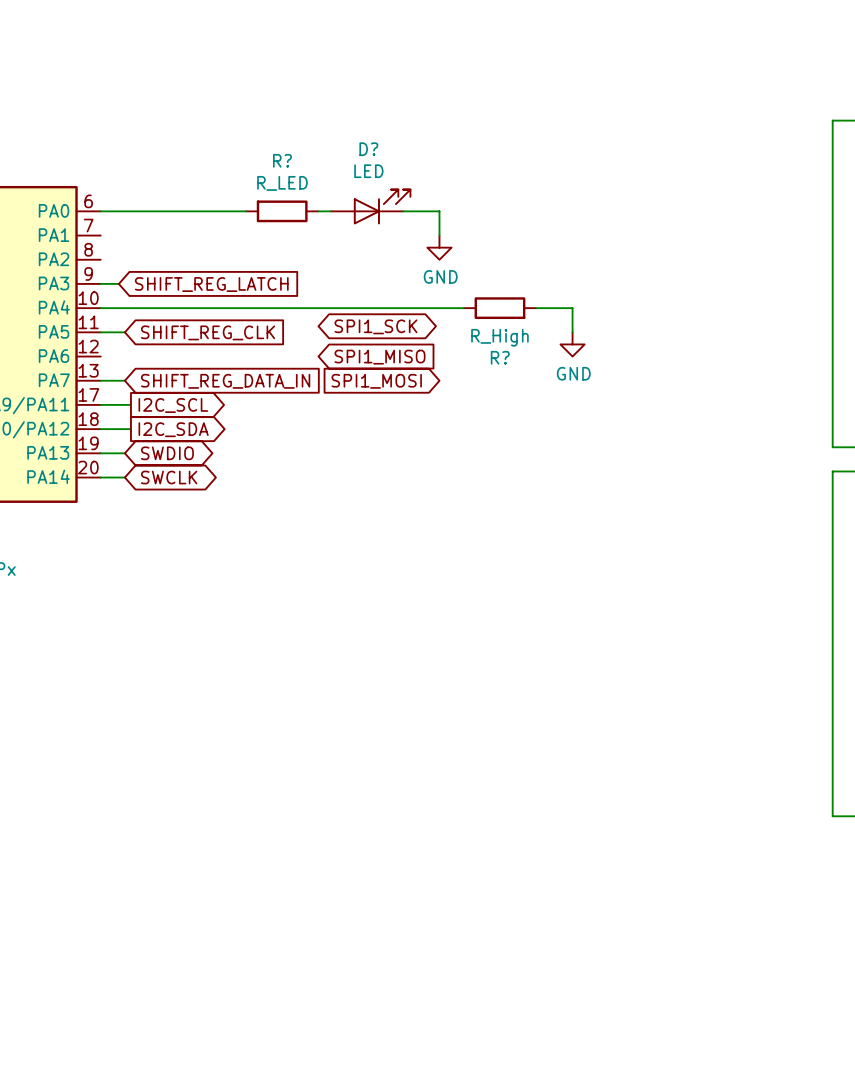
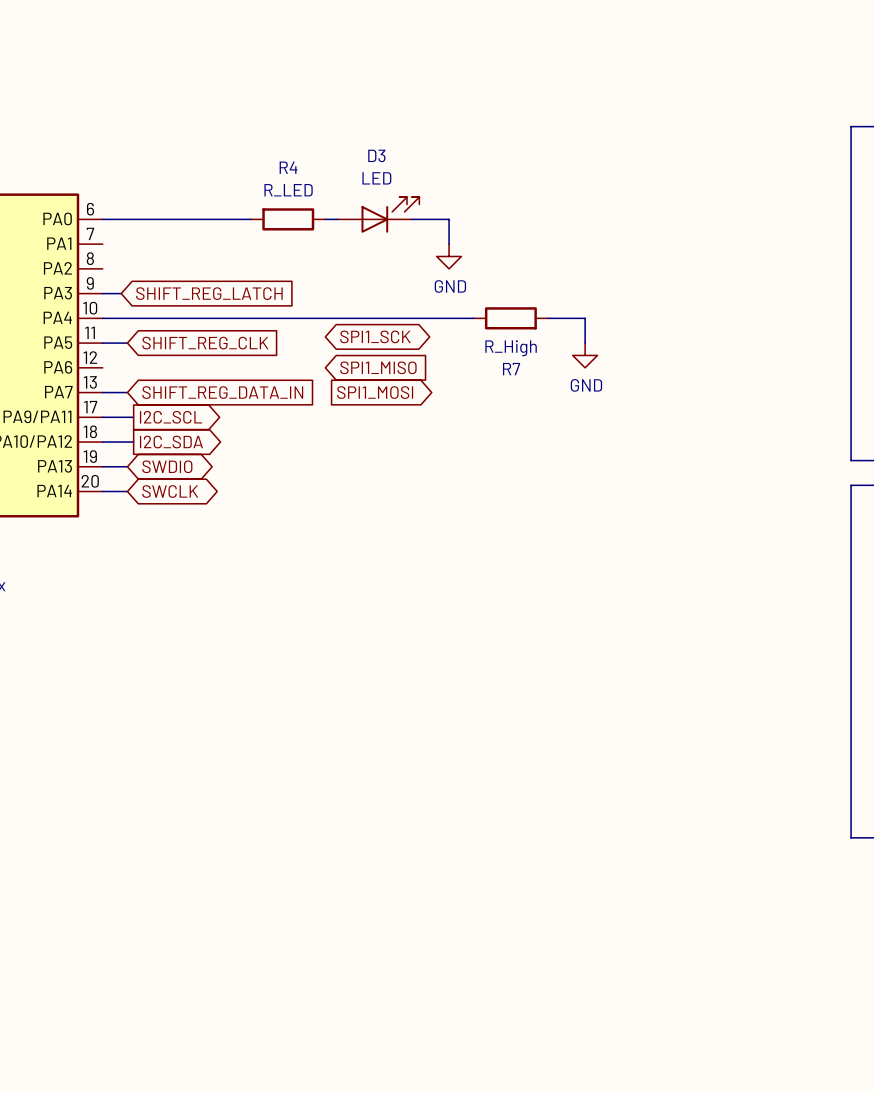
D? name: D? (368, 149) -> D3 (376, 155)
R? name: R? (282, 160) -> R4 (288, 167)
R? name: R? (500, 357) -> R7 (511, 369)

